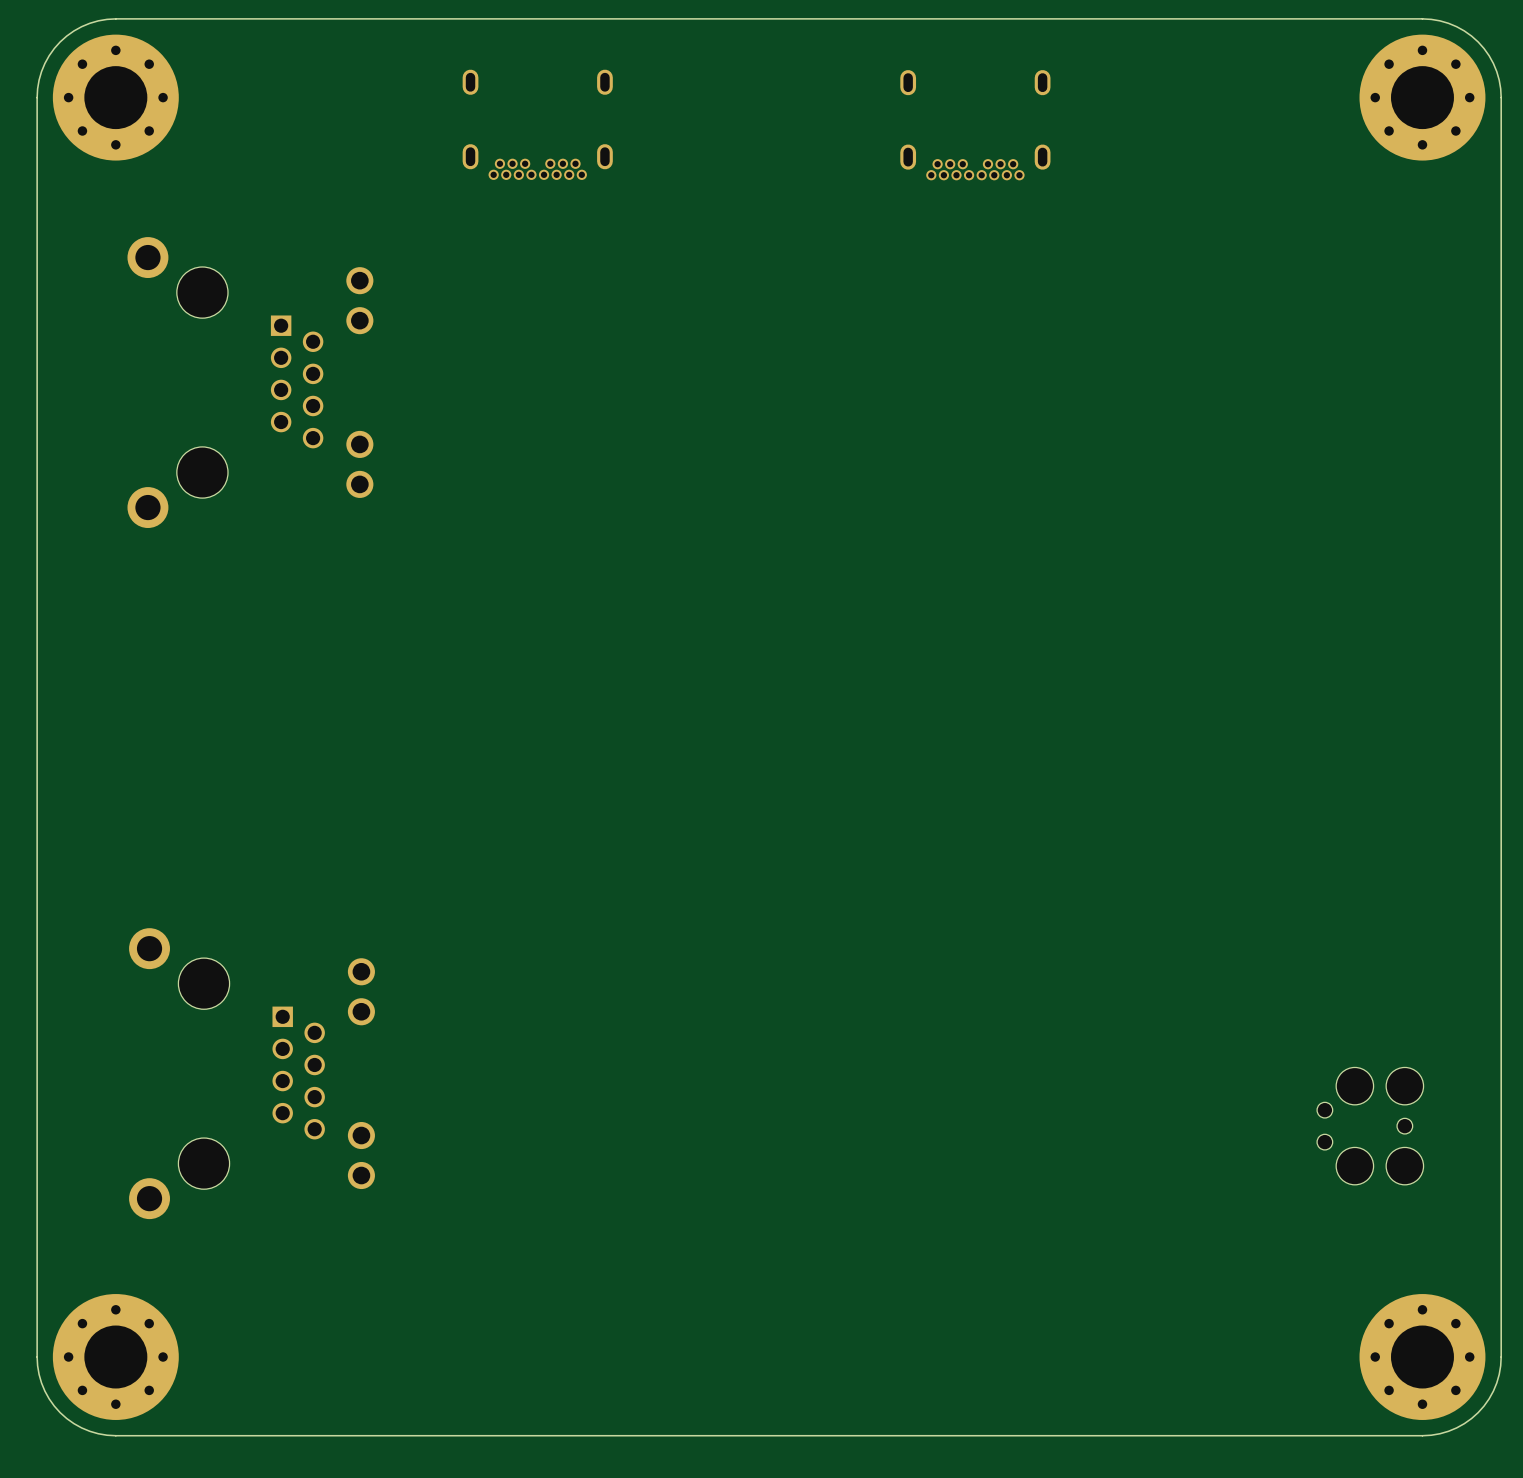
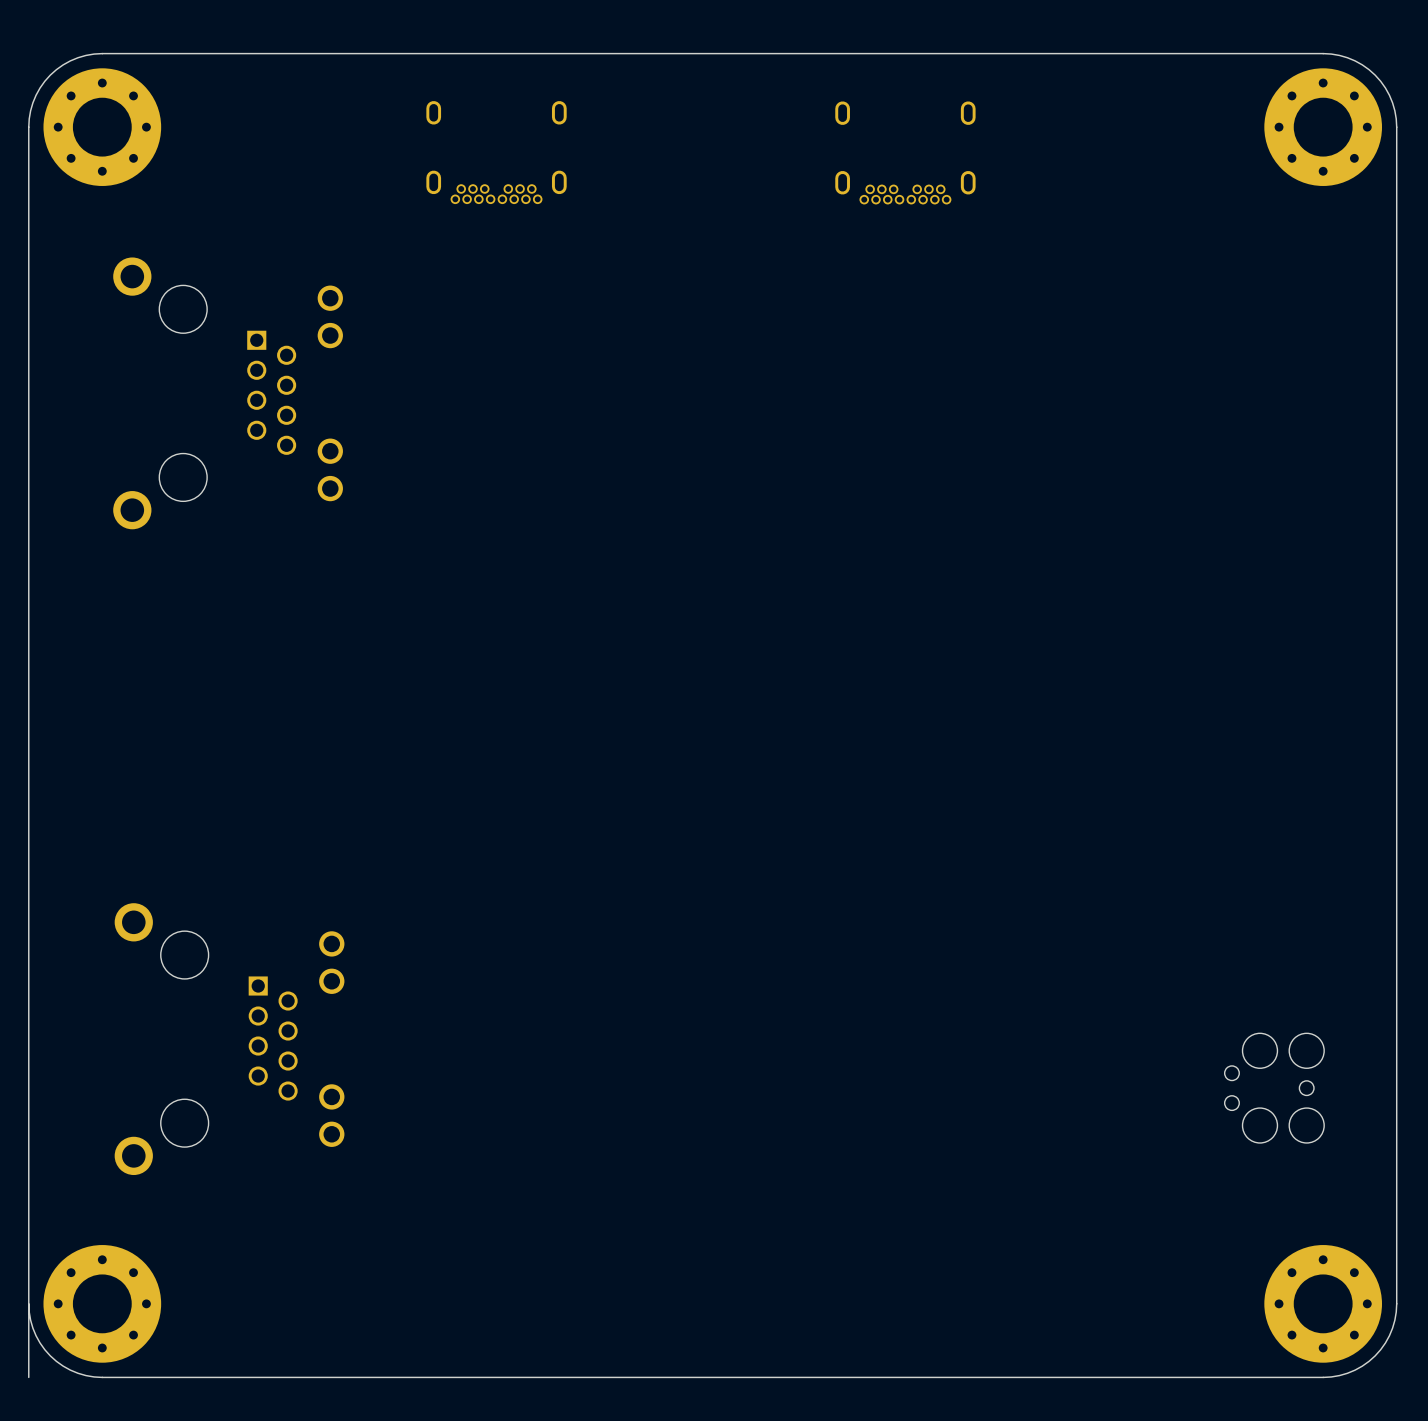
board edge: none -> (28, 1303) (28, 1377)

